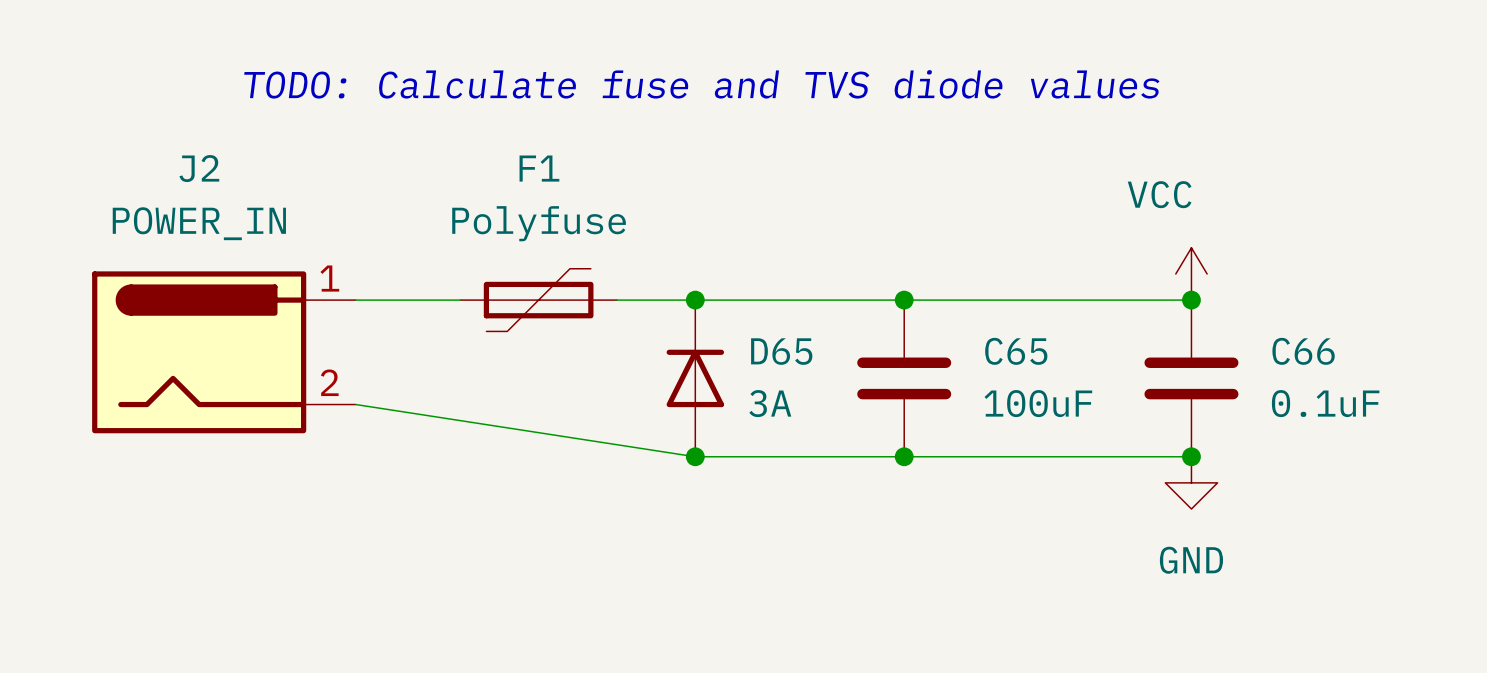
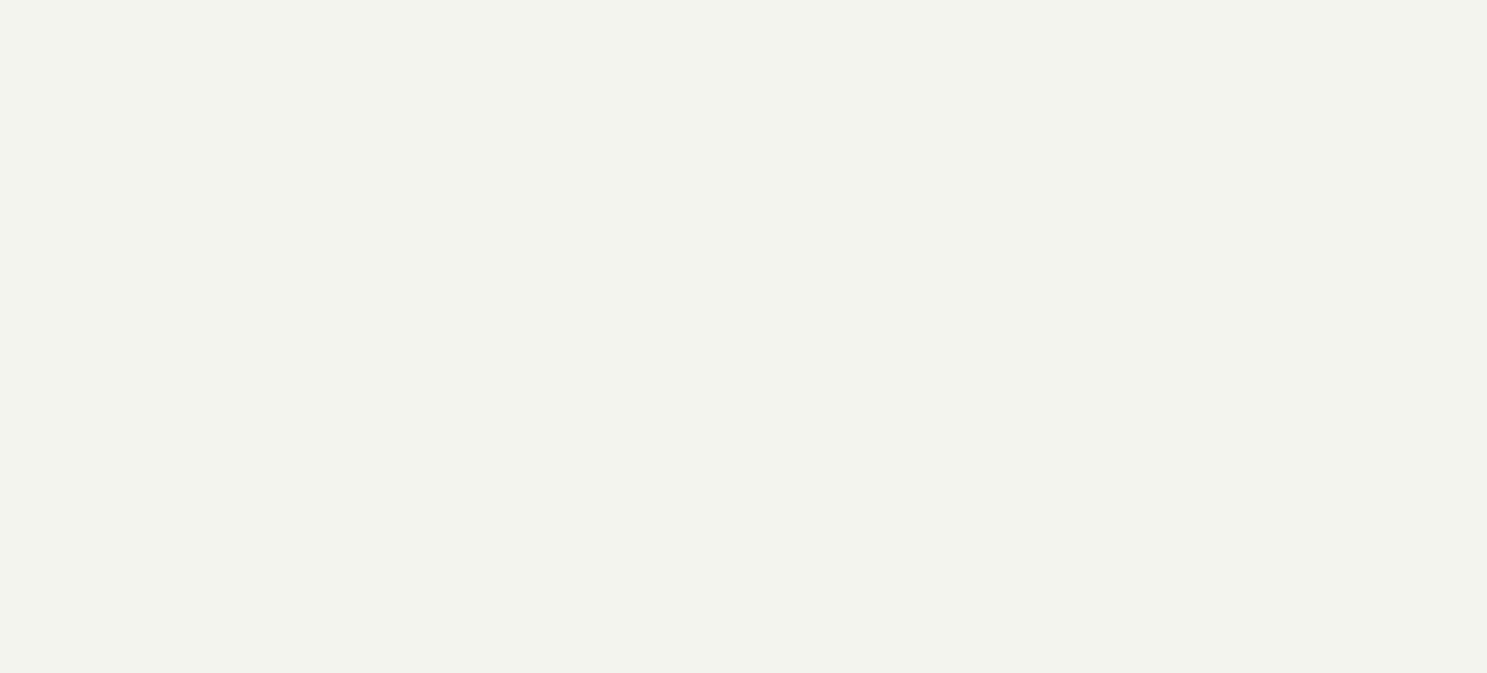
text: TODO: Calculate fuse and TVS diode values (701, 84) -> none
power symbol: VCC (1191, 273) -> none
wire: (355, 300) (460, 300) -> none
F1: Polyfuse (538, 300) -> none
wire: (616, 300) (1191, 300) -> none
junction: (695, 300) -> none
junction: (904, 300) -> none
junction: (1191, 300) -> none
J2: POWER_IN (223, 352) -> none
D65: 3A (695, 378) -> none
C65: 100uF (904, 378) -> none
C66: 0.1uF (1191, 378) -> none
wire: (355, 404) (695, 456) (1191, 456) -> none
junction: (695, 456) -> none
junction: (904, 456) -> none
junction: (1191, 456) -> none
power symbol: GND (1191, 482) -> none

